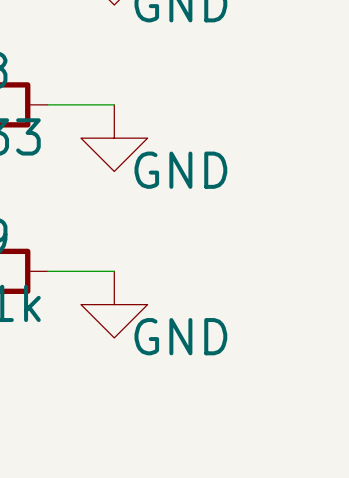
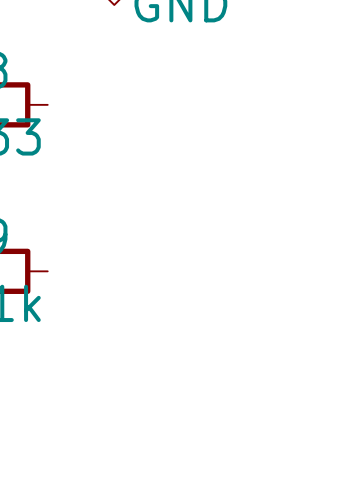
wire: (47, 104) (114, 104) -> none
power symbol: GND (114, 138) -> none
wire: (47, 271) (114, 271) -> none
power symbol: GND (114, 304) -> none

